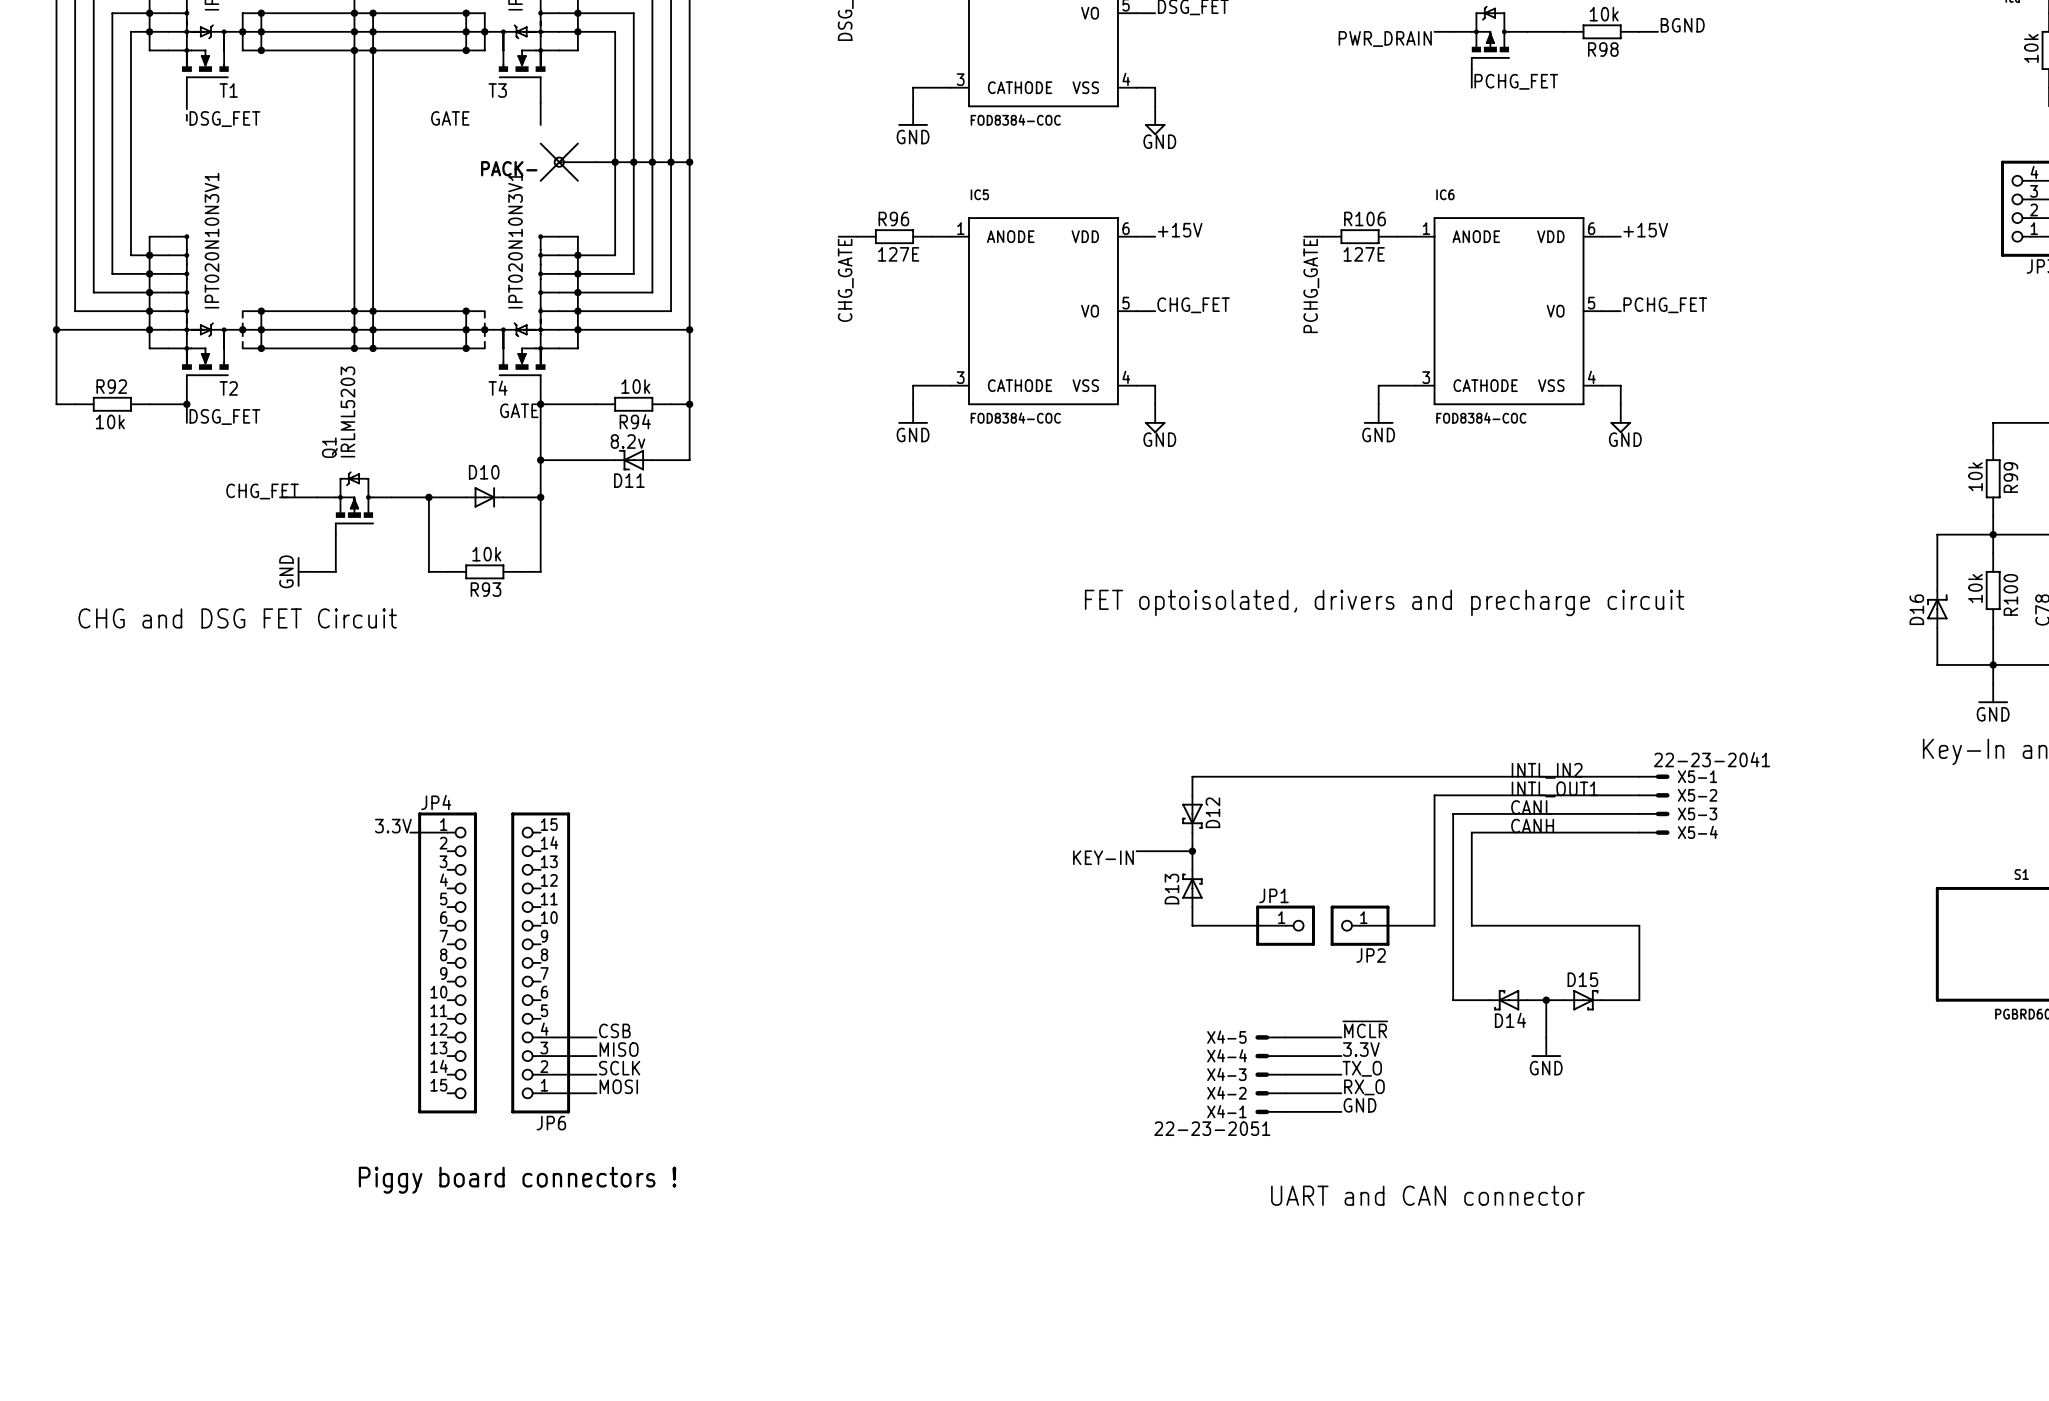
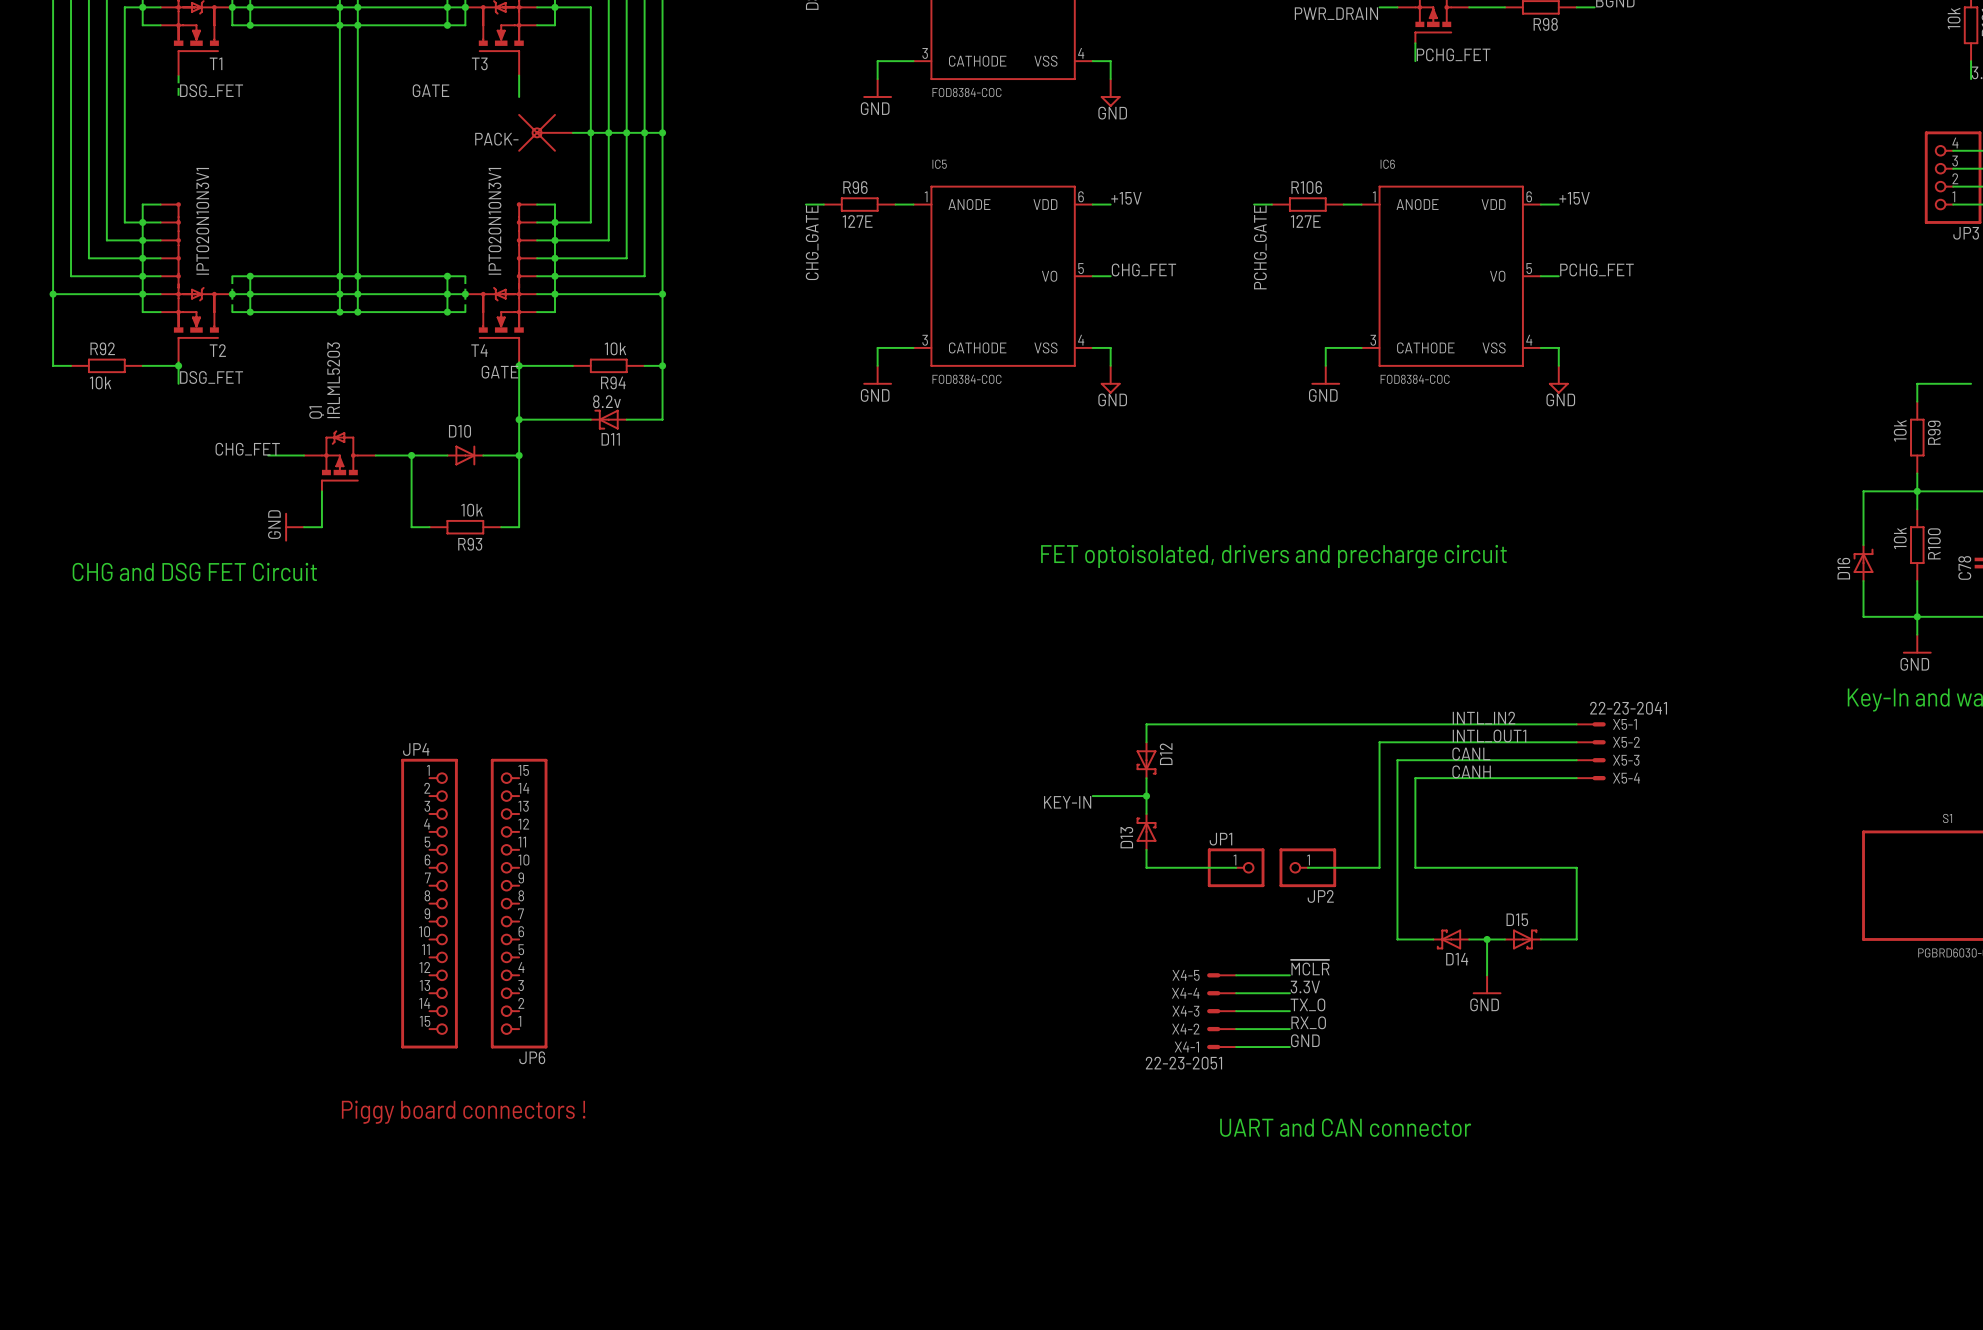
label: 3.3V (393, 826) -> none
wire: (410, 832) (447, 832) -> none
label: CSB (614, 1030) -> none
wire: (540, 1037) (596, 1037) -> none
label: MISO (619, 1049) -> none
wire: (540, 1056) (596, 1056) -> none
label: SCLK (619, 1068) -> none
wire: (540, 1074) (596, 1074) -> none
label: MOSI (618, 1086) -> none
wire: (540, 1093) (596, 1093) -> none

